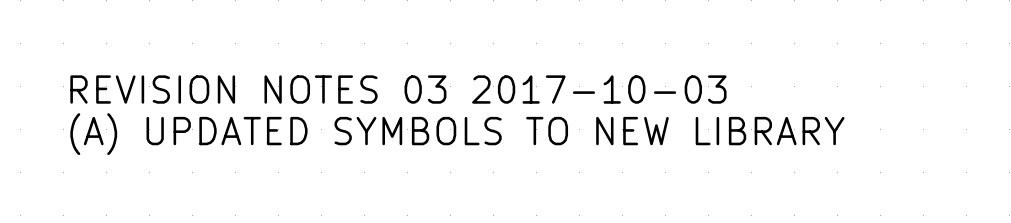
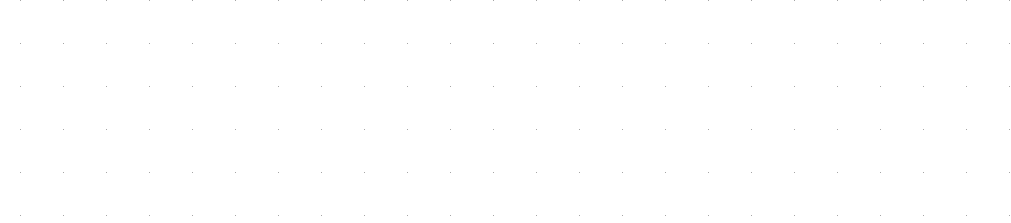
text: REVISION NOTES 03 2017-10-03 (398, 89) -> none
text: (A) UPDATED SYMBOLS TO NEW LIBRARY (457, 134) -> none

